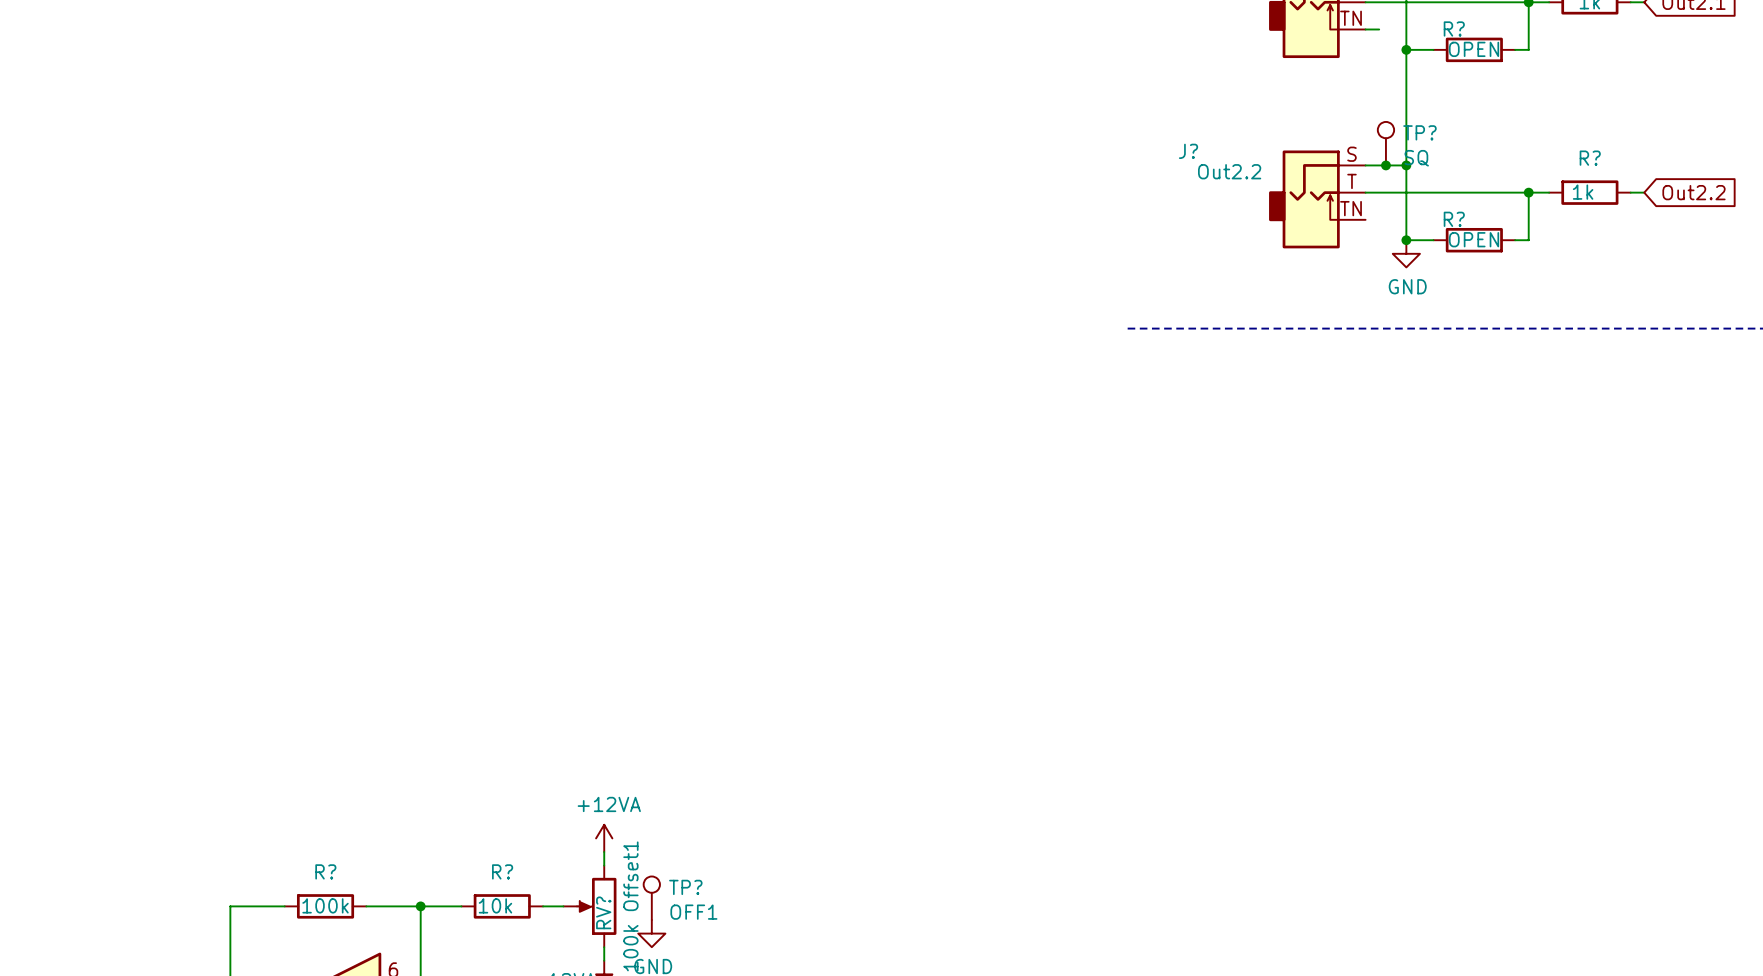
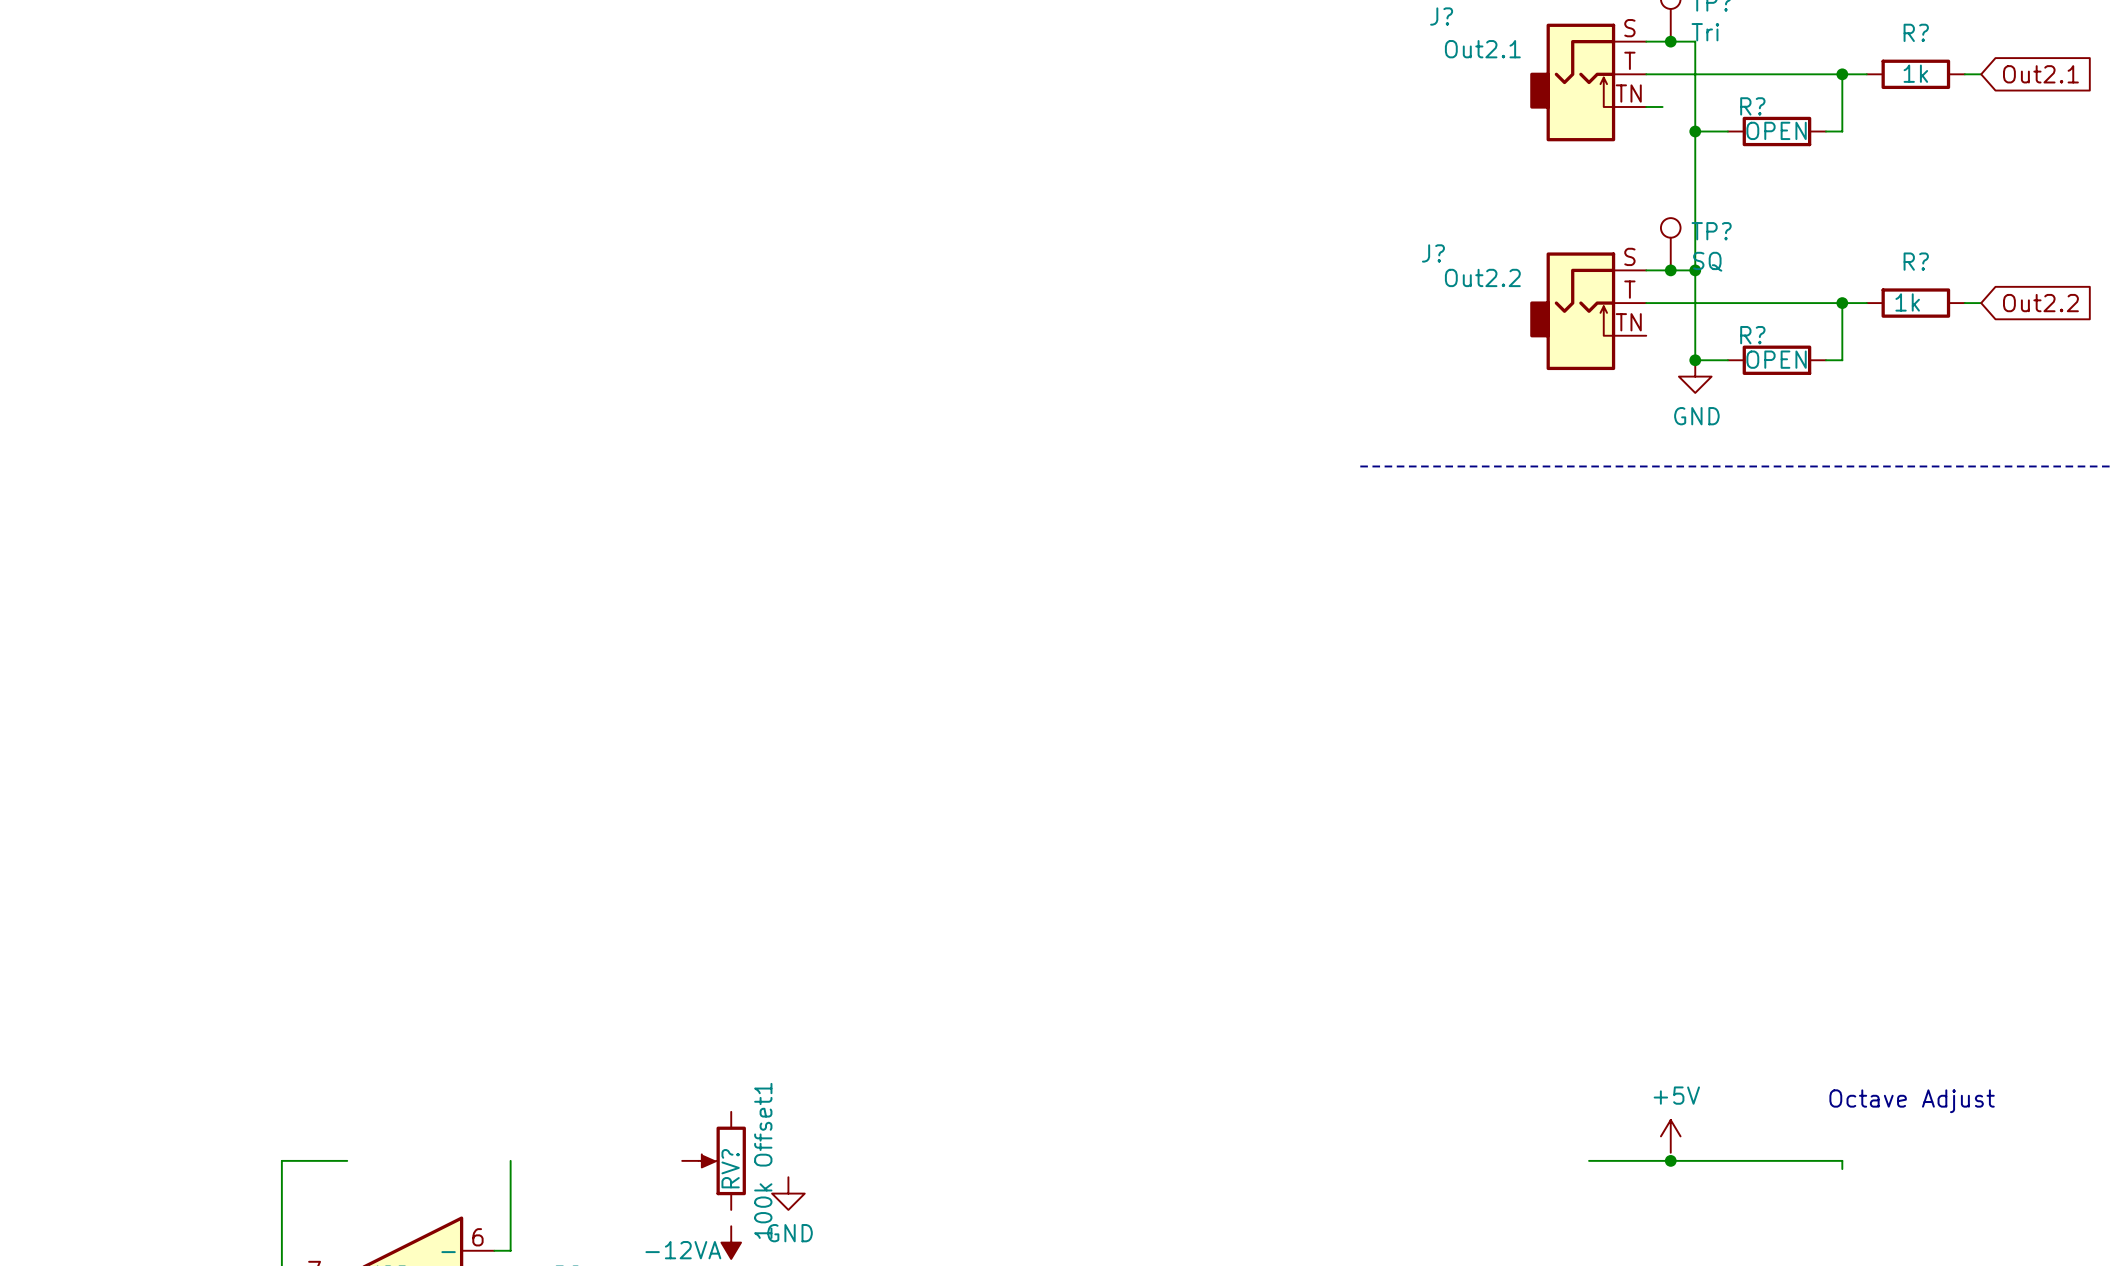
power symbol: +12VA (604, 838) -> none
wire: (604, 852) (604, 865) -> none
text: none -> Octave Adjust (1912, 1101)
power symbol: none -> +5V (1670, 1136)
TP?: OFF1 (651, 898) -> none
R?: 100k (325, 906) -> none
wire: (366, 906) (461, 906) -> none
junction: (420, 906) -> none
R?: 10k (502, 906) -> none
wire: (543, 906) (563, 906) -> none
wire: none -> (1589, 1160) (1842, 1160) (1842, 1169)
junction: none -> (1670, 1160)
wire: (604, 947) (604, 960) -> none

